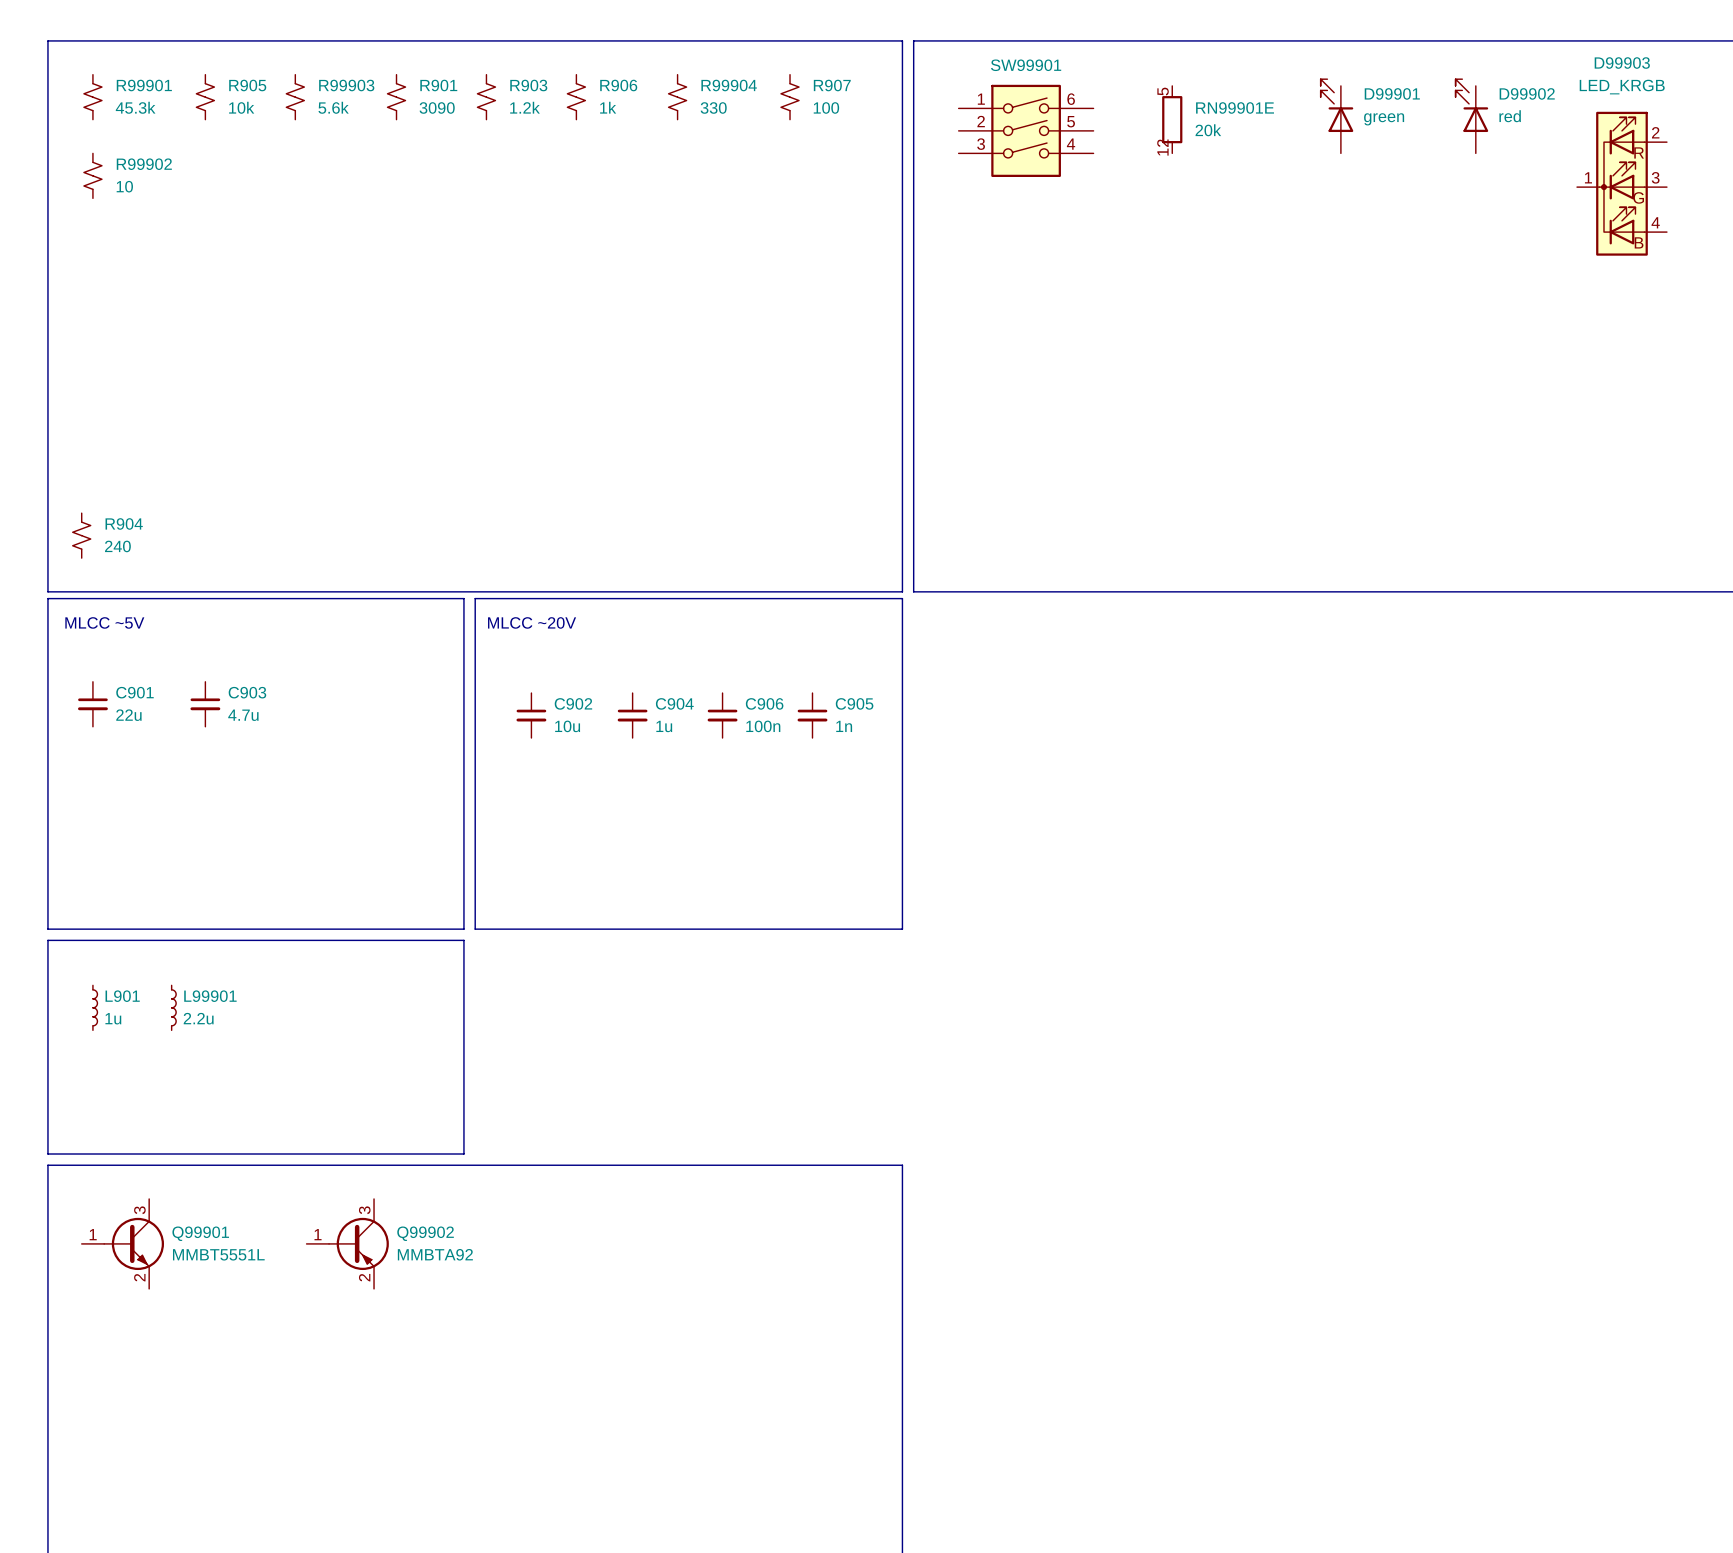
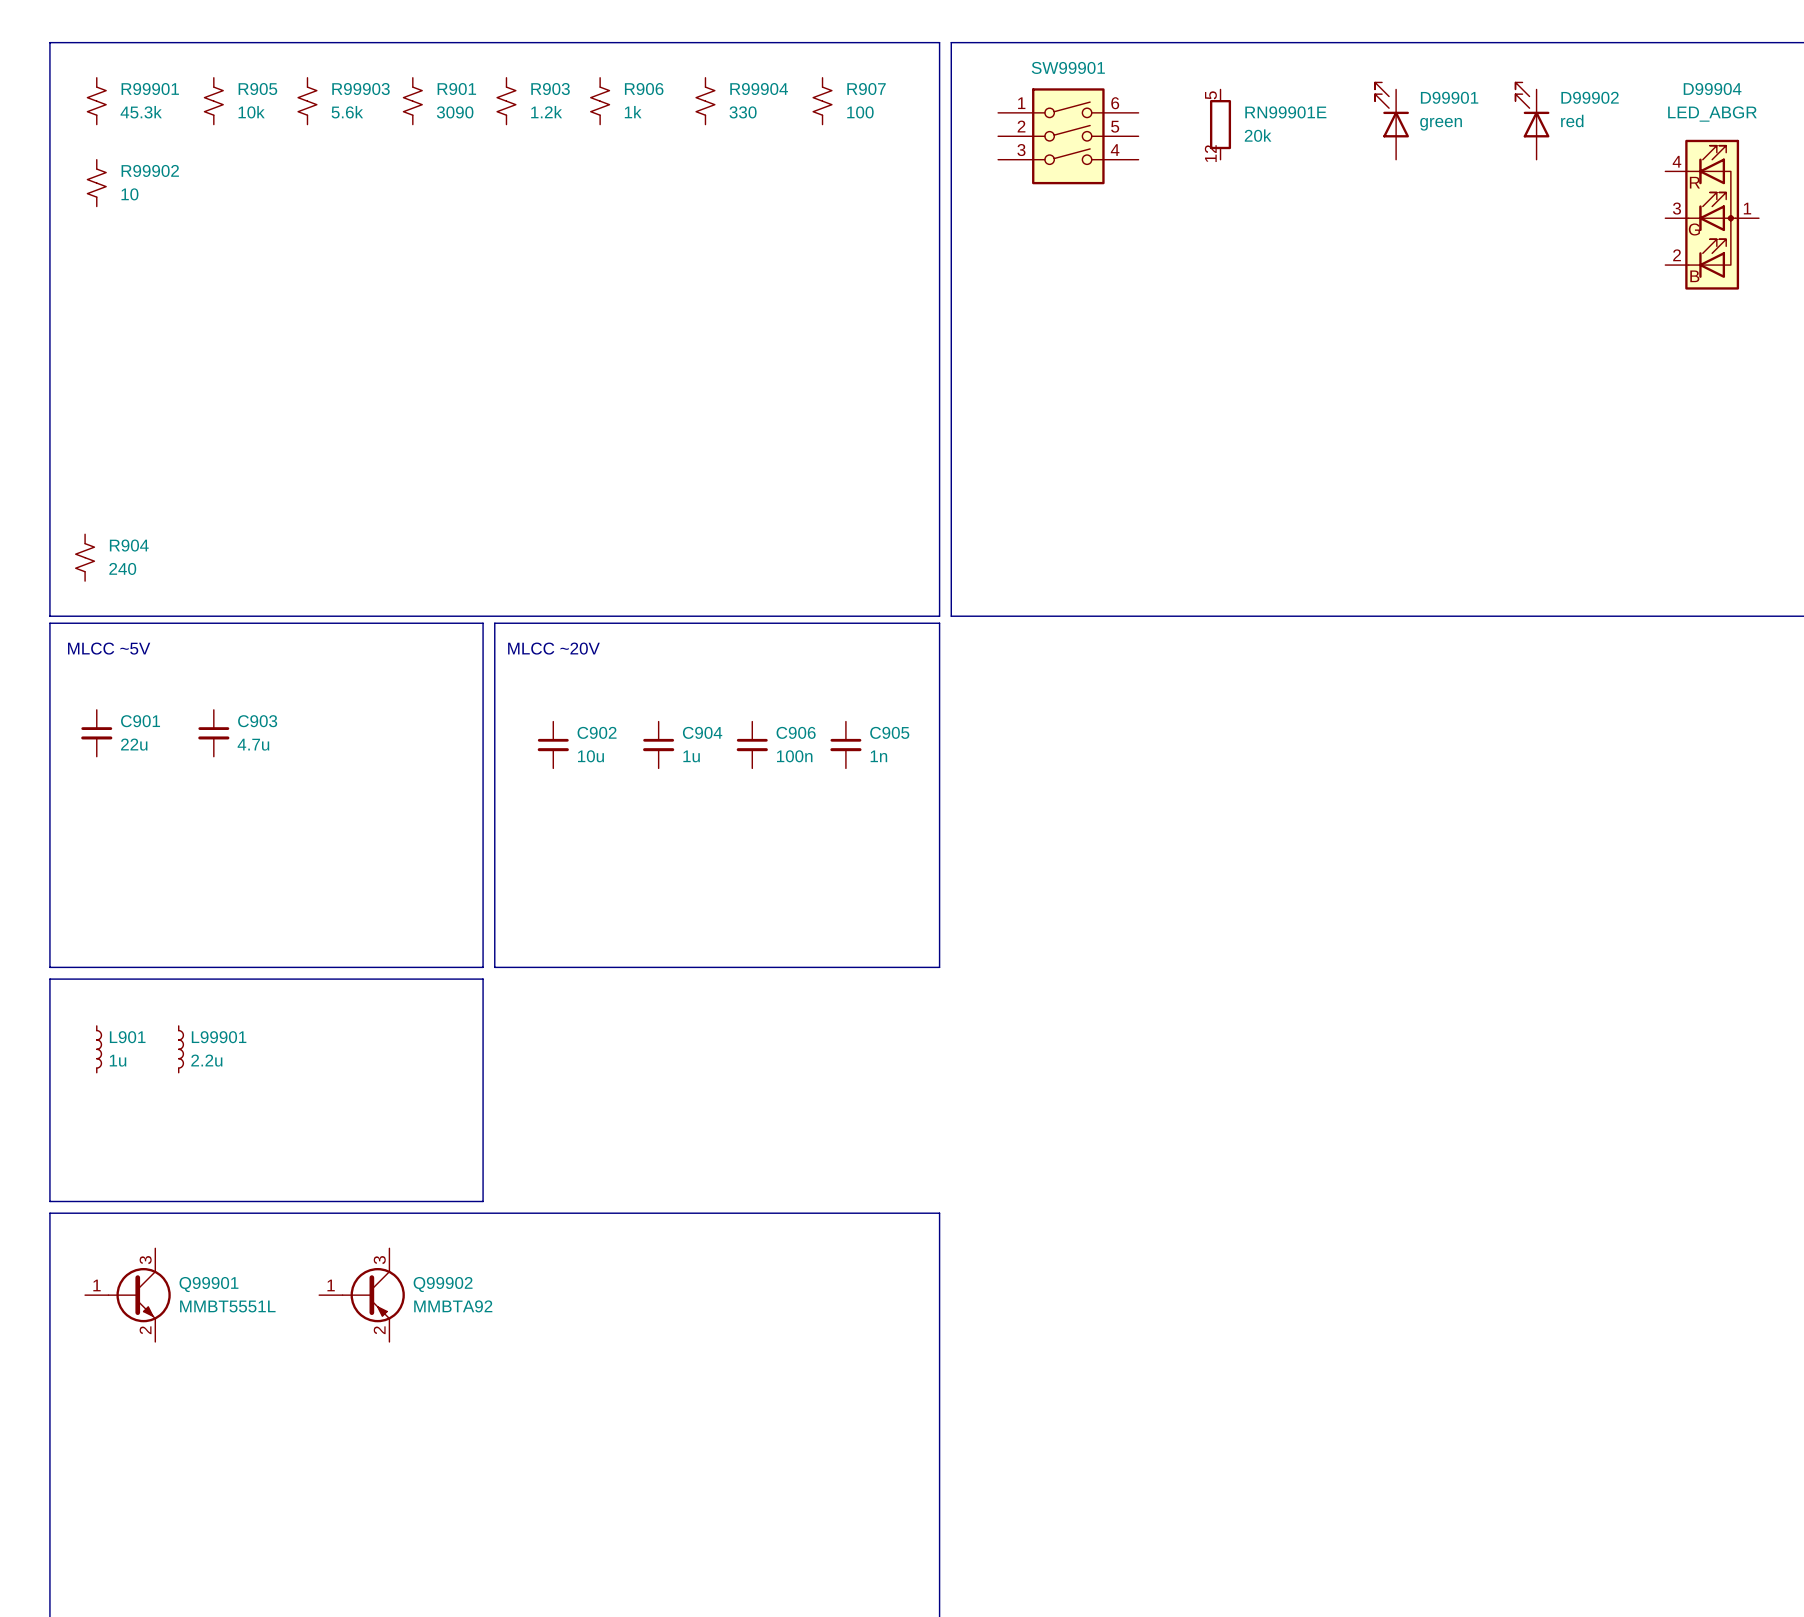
D99903: LED_KRGB (1621, 183) -> none
D99904: none -> LED_ABGR (1712, 214)

